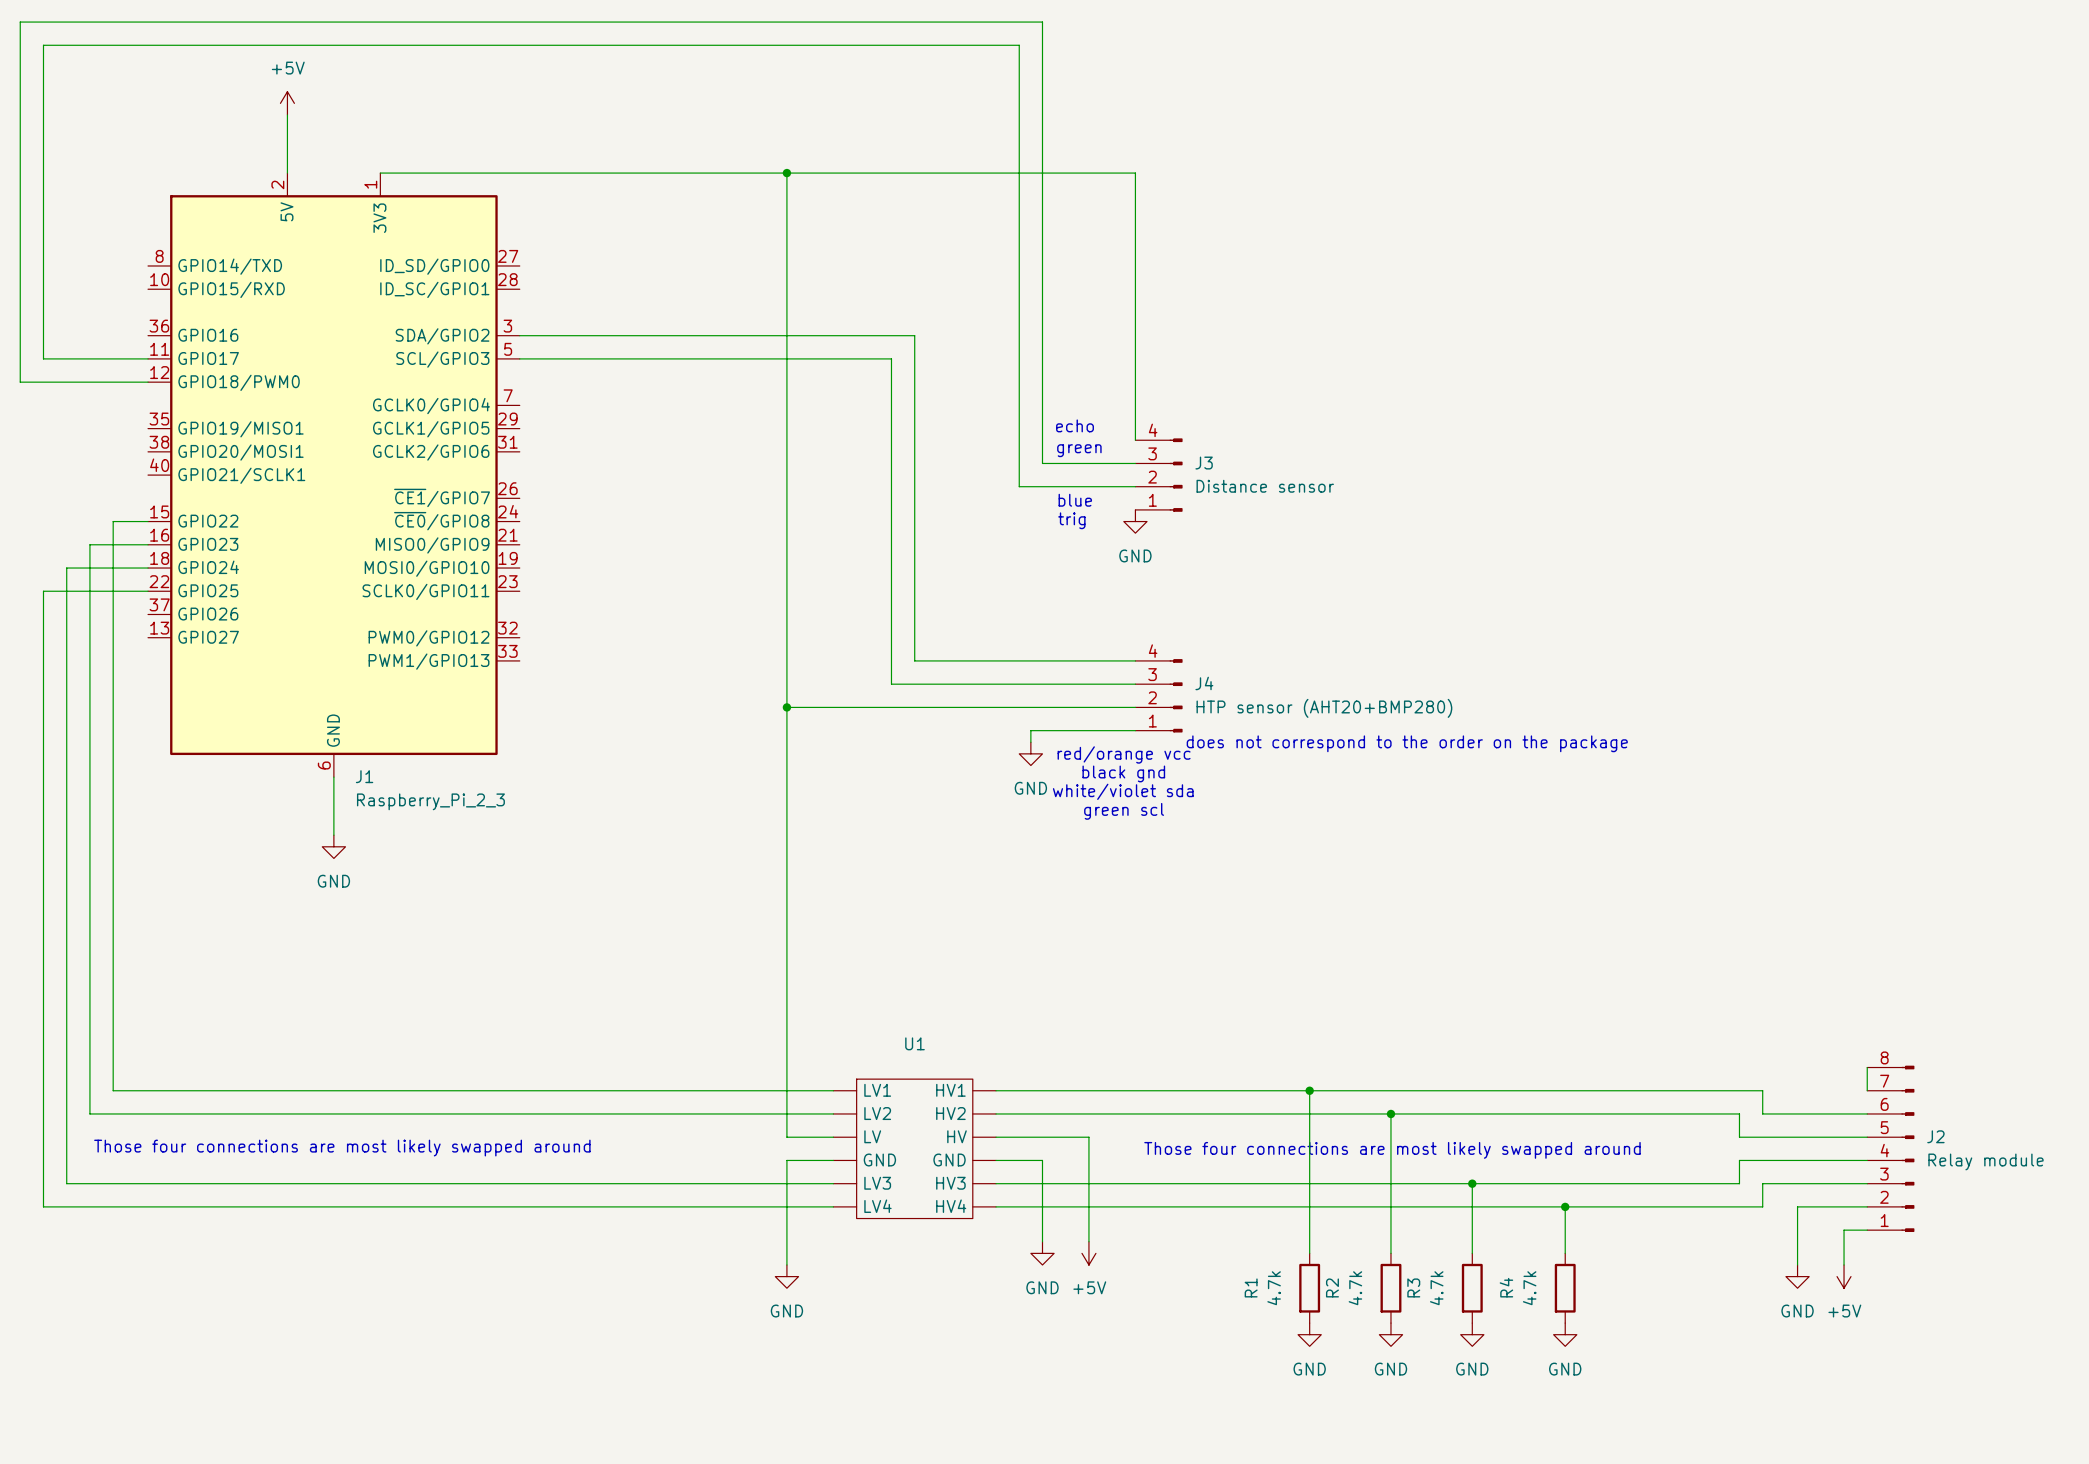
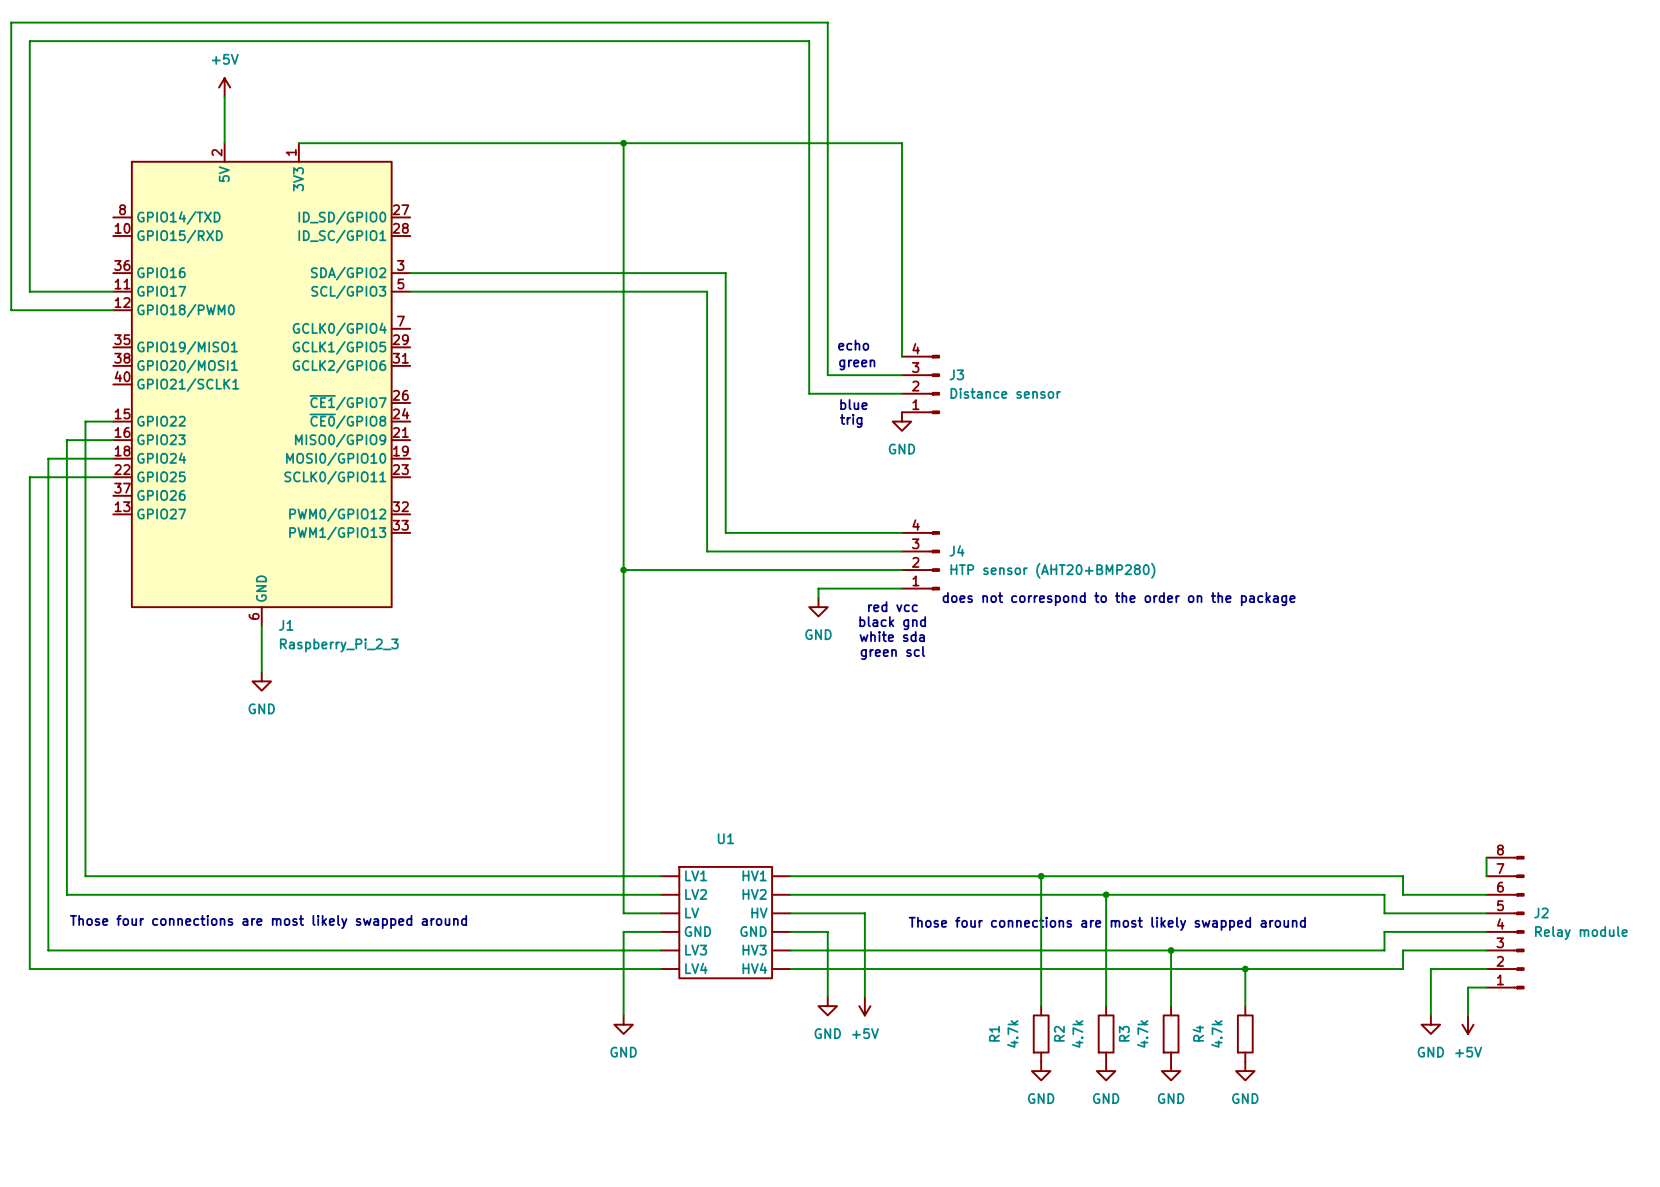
text: red/orange vcc (1124, 754) -> red vcc (892, 606)
text: white/violet sda (1123, 791) -> white sda (892, 636)

